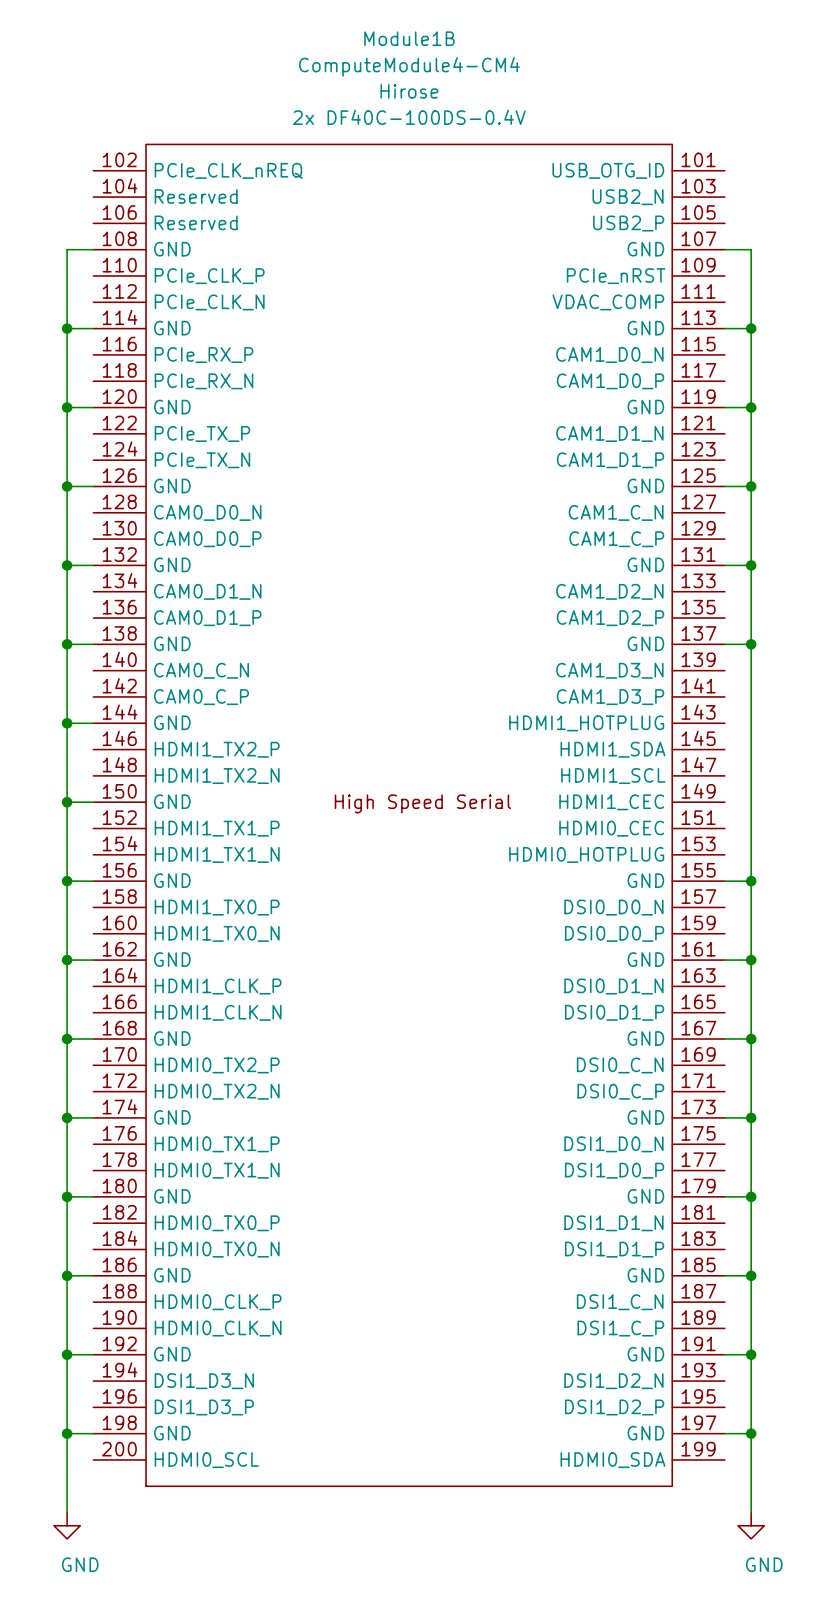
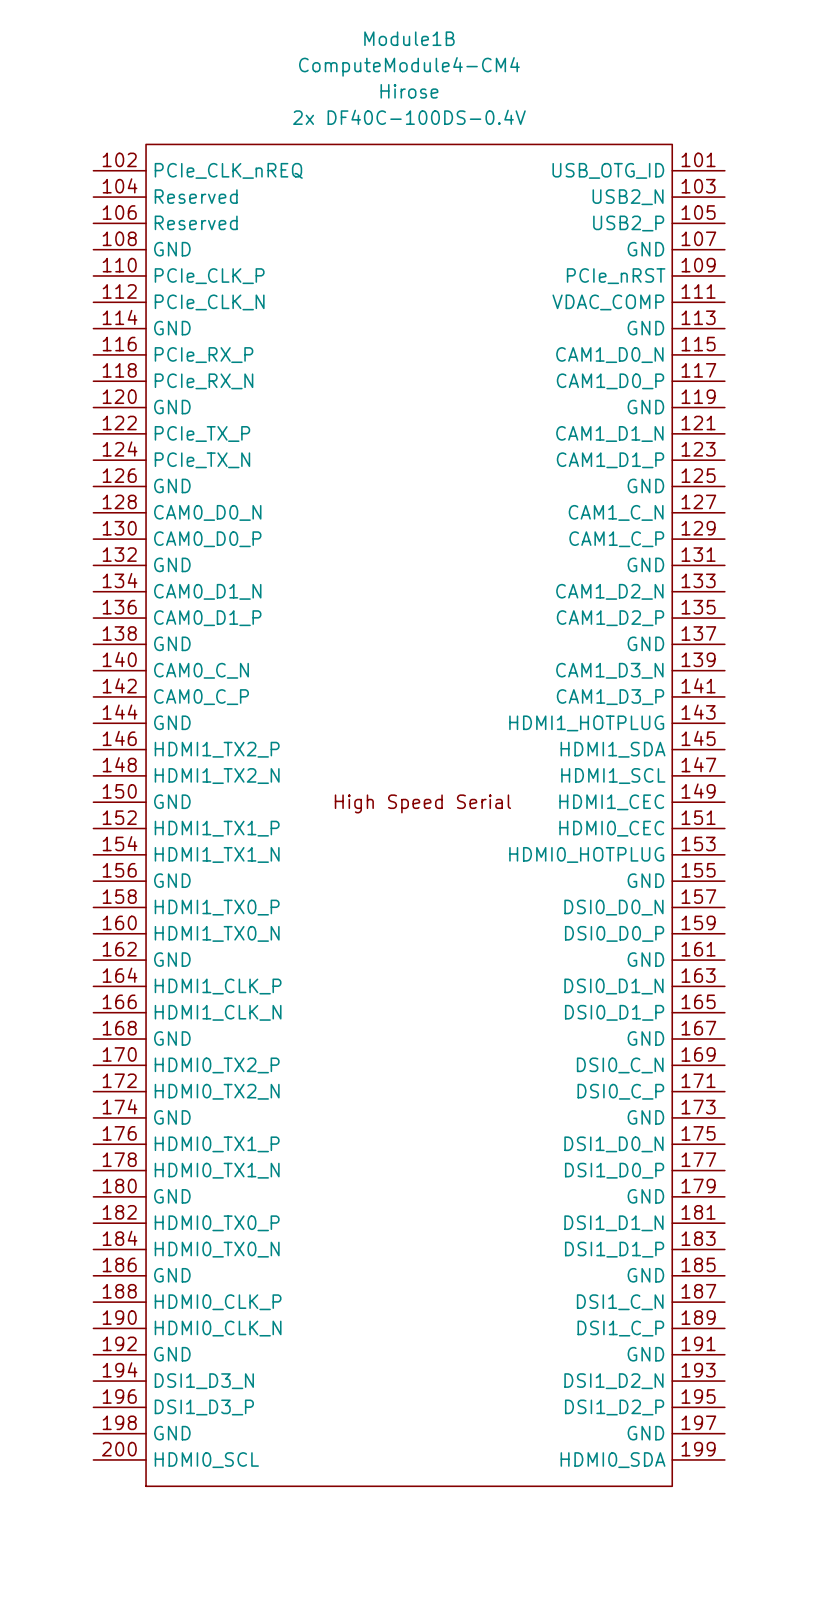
wire: (93, 249) (67, 249) (67, 1512) -> none
wire: (724, 249) (751, 249) (751, 1512) -> none
wire: (67, 328) (93, 328) -> none
junction: (67, 328) -> none
wire: (724, 328) (751, 328) -> none
junction: (751, 328) -> none
wire: (67, 407) (93, 407) -> none
junction: (67, 407) -> none
wire: (724, 407) (751, 407) -> none
junction: (751, 407) -> none
wire: (67, 486) (93, 486) -> none
junction: (67, 486) -> none
wire: (724, 486) (751, 486) -> none
junction: (751, 486) -> none
wire: (67, 565) (93, 565) -> none
junction: (67, 565) -> none
wire: (724, 565) (751, 565) -> none
junction: (751, 565) -> none
wire: (67, 644) (93, 644) -> none
junction: (67, 644) -> none
wire: (724, 644) (751, 644) -> none
junction: (751, 644) -> none
wire: (67, 723) (93, 723) -> none
junction: (67, 723) -> none
wire: (67, 802) (93, 802) -> none
junction: (67, 802) -> none
wire: (67, 881) (93, 881) -> none
junction: (67, 881) -> none
wire: (724, 881) (751, 881) -> none
junction: (751, 881) -> none
wire: (67, 960) (93, 960) -> none
junction: (67, 960) -> none
wire: (724, 960) (751, 960) -> none
junction: (751, 960) -> none
wire: (67, 1039) (93, 1039) -> none
junction: (67, 1039) -> none
wire: (724, 1039) (751, 1039) -> none
junction: (751, 1039) -> none
wire: (67, 1117) (93, 1117) -> none
junction: (67, 1117) -> none
wire: (724, 1117) (751, 1117) -> none
junction: (751, 1117) -> none
wire: (67, 1196) (93, 1196) -> none
junction: (67, 1196) -> none
wire: (724, 1196) (751, 1196) -> none
junction: (751, 1196) -> none
wire: (67, 1275) (93, 1275) -> none
junction: (67, 1275) -> none
wire: (724, 1275) (751, 1275) -> none
junction: (751, 1275) -> none
wire: (67, 1354) (93, 1354) -> none
junction: (67, 1354) -> none
wire: (724, 1354) (751, 1354) -> none
junction: (751, 1354) -> none
wire: (67, 1433) (93, 1433) -> none
junction: (67, 1433) -> none
wire: (724, 1433) (751, 1433) -> none
junction: (751, 1433) -> none
power symbol: GND (67, 1525) -> none
power symbol: GND (751, 1525) -> none

